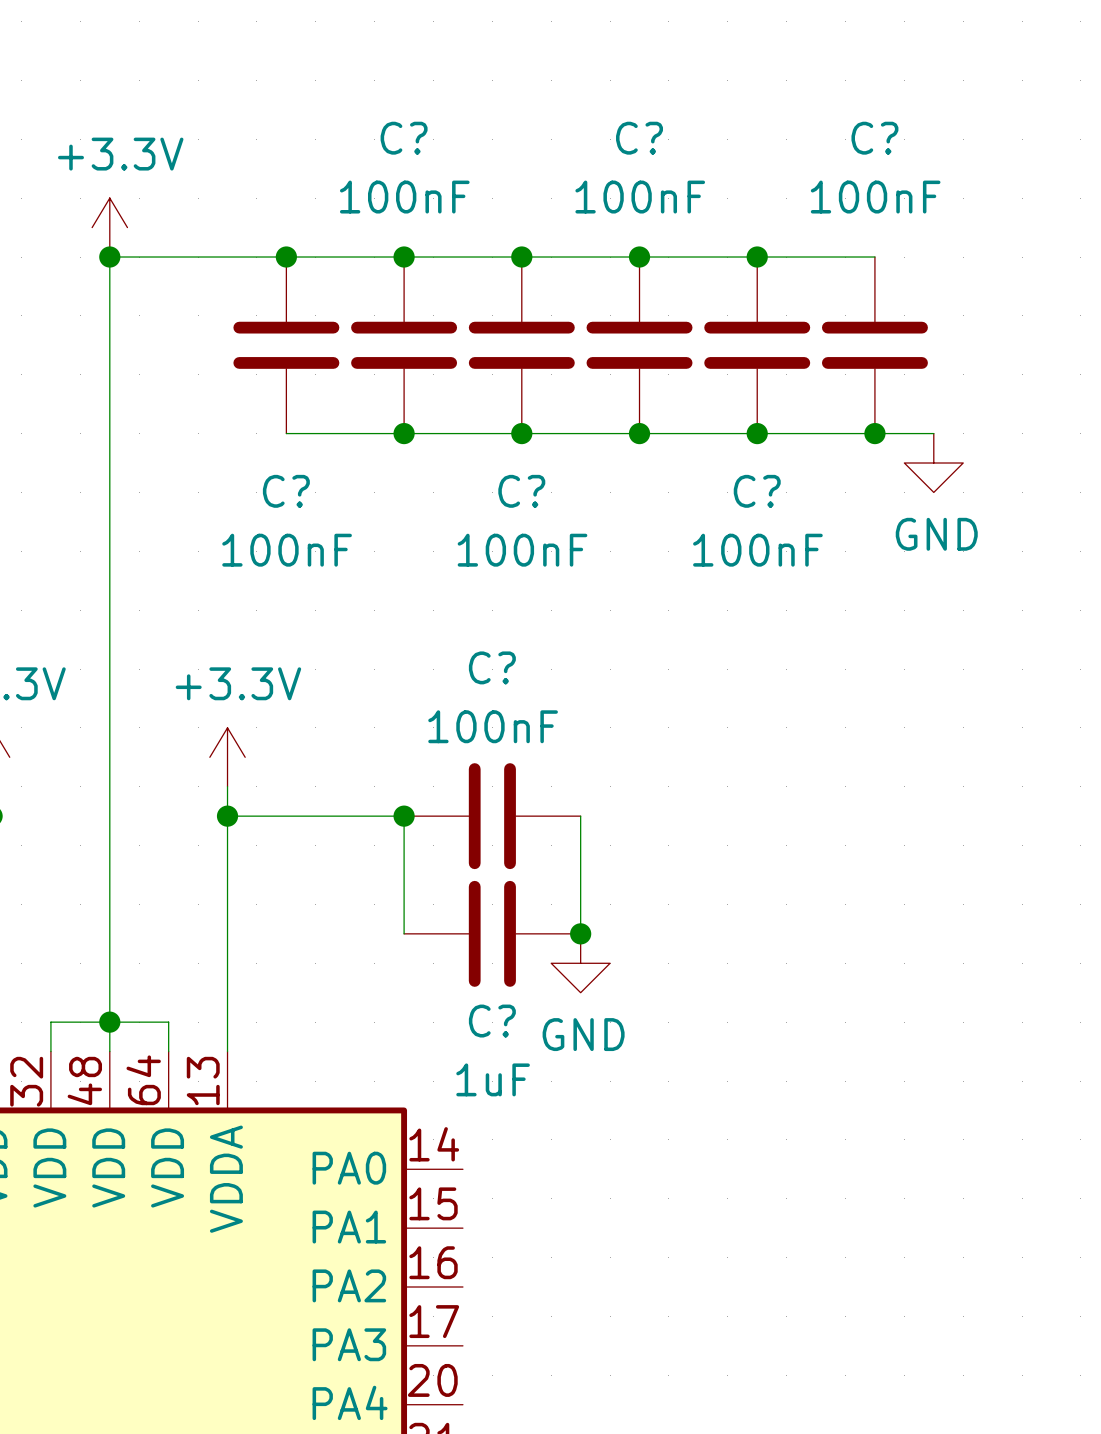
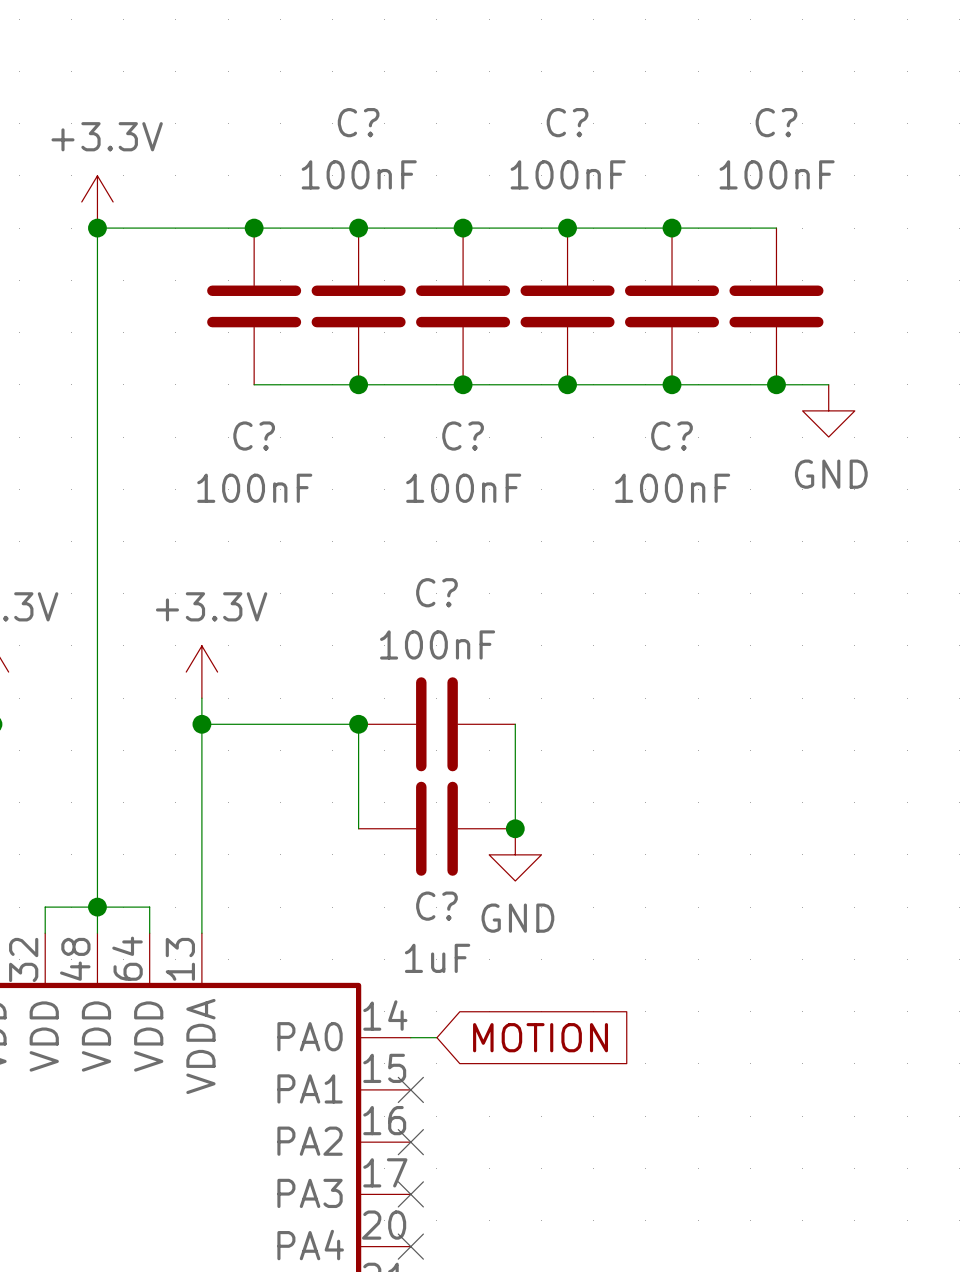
wire: none -> (410, 1037) (436, 1037)
global label: none -> MOTION (540, 1037)
no-connect mark: none -> (410, 1089)
no-connect mark: none -> (410, 1142)
no-connect mark: none -> (410, 1194)
no-connect mark: none -> (410, 1246)

